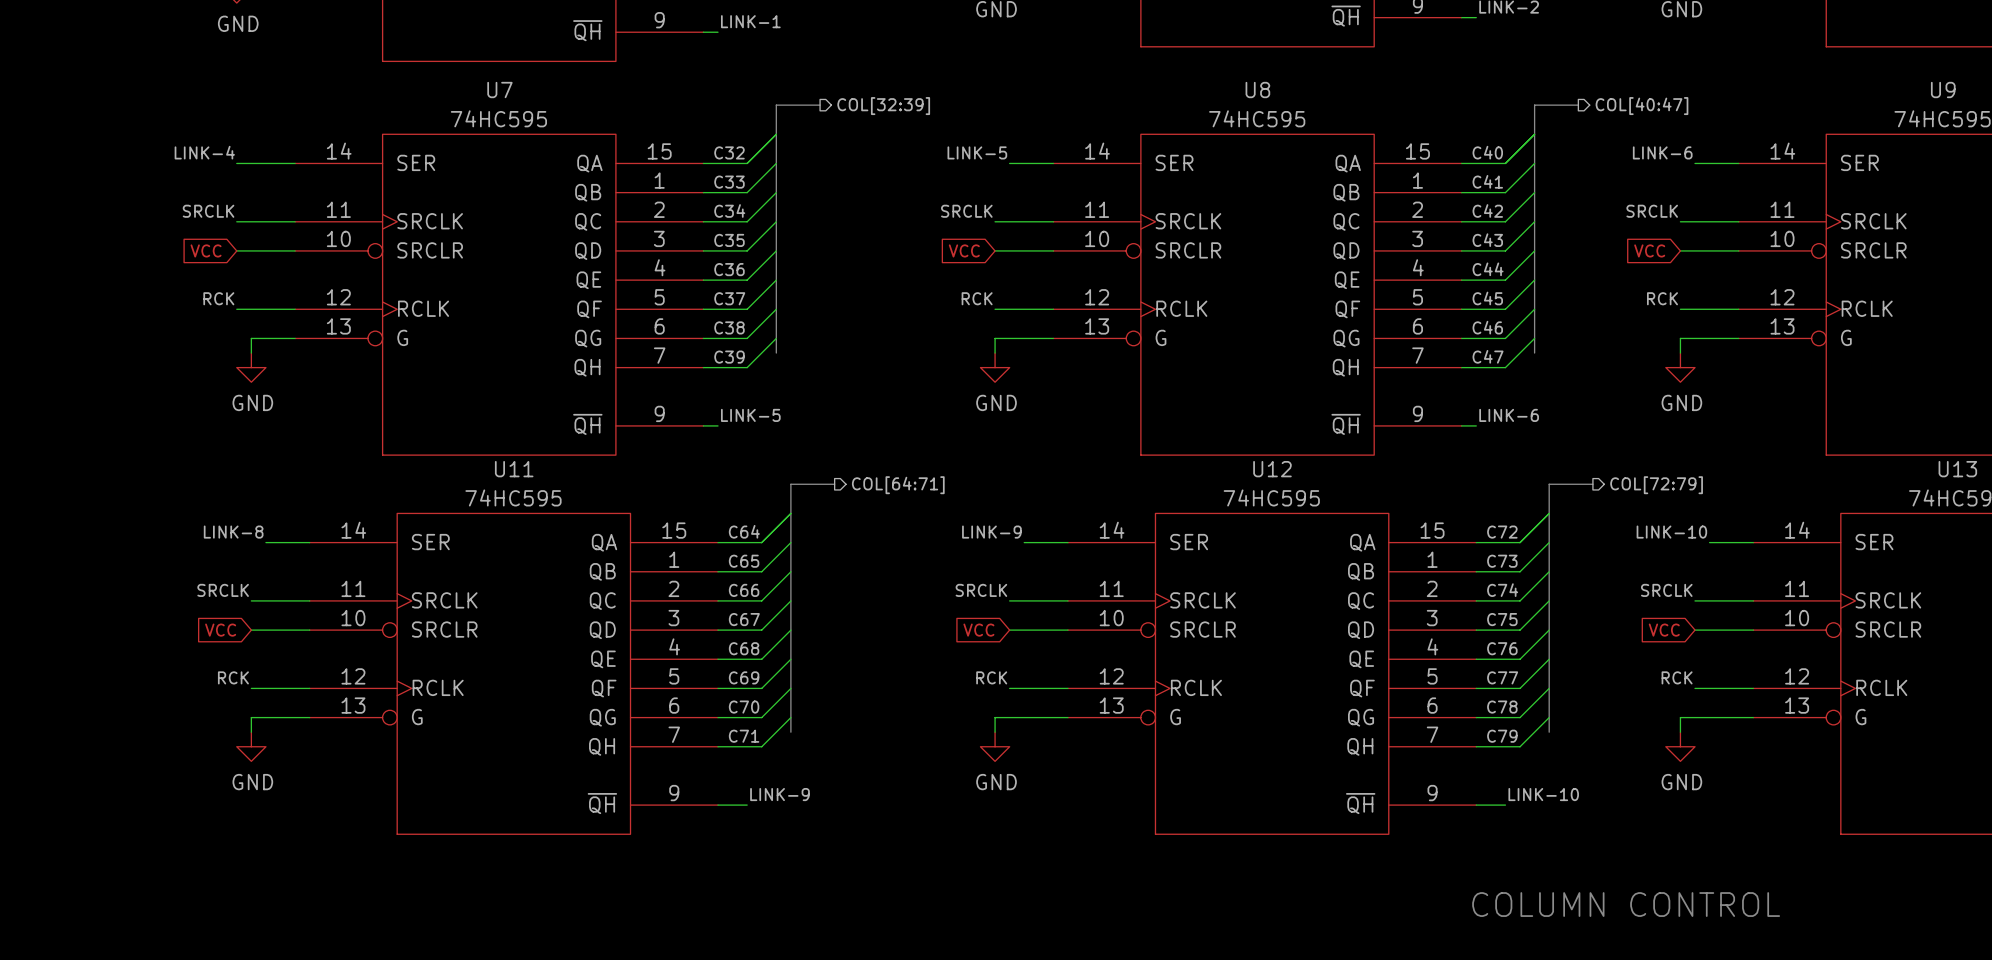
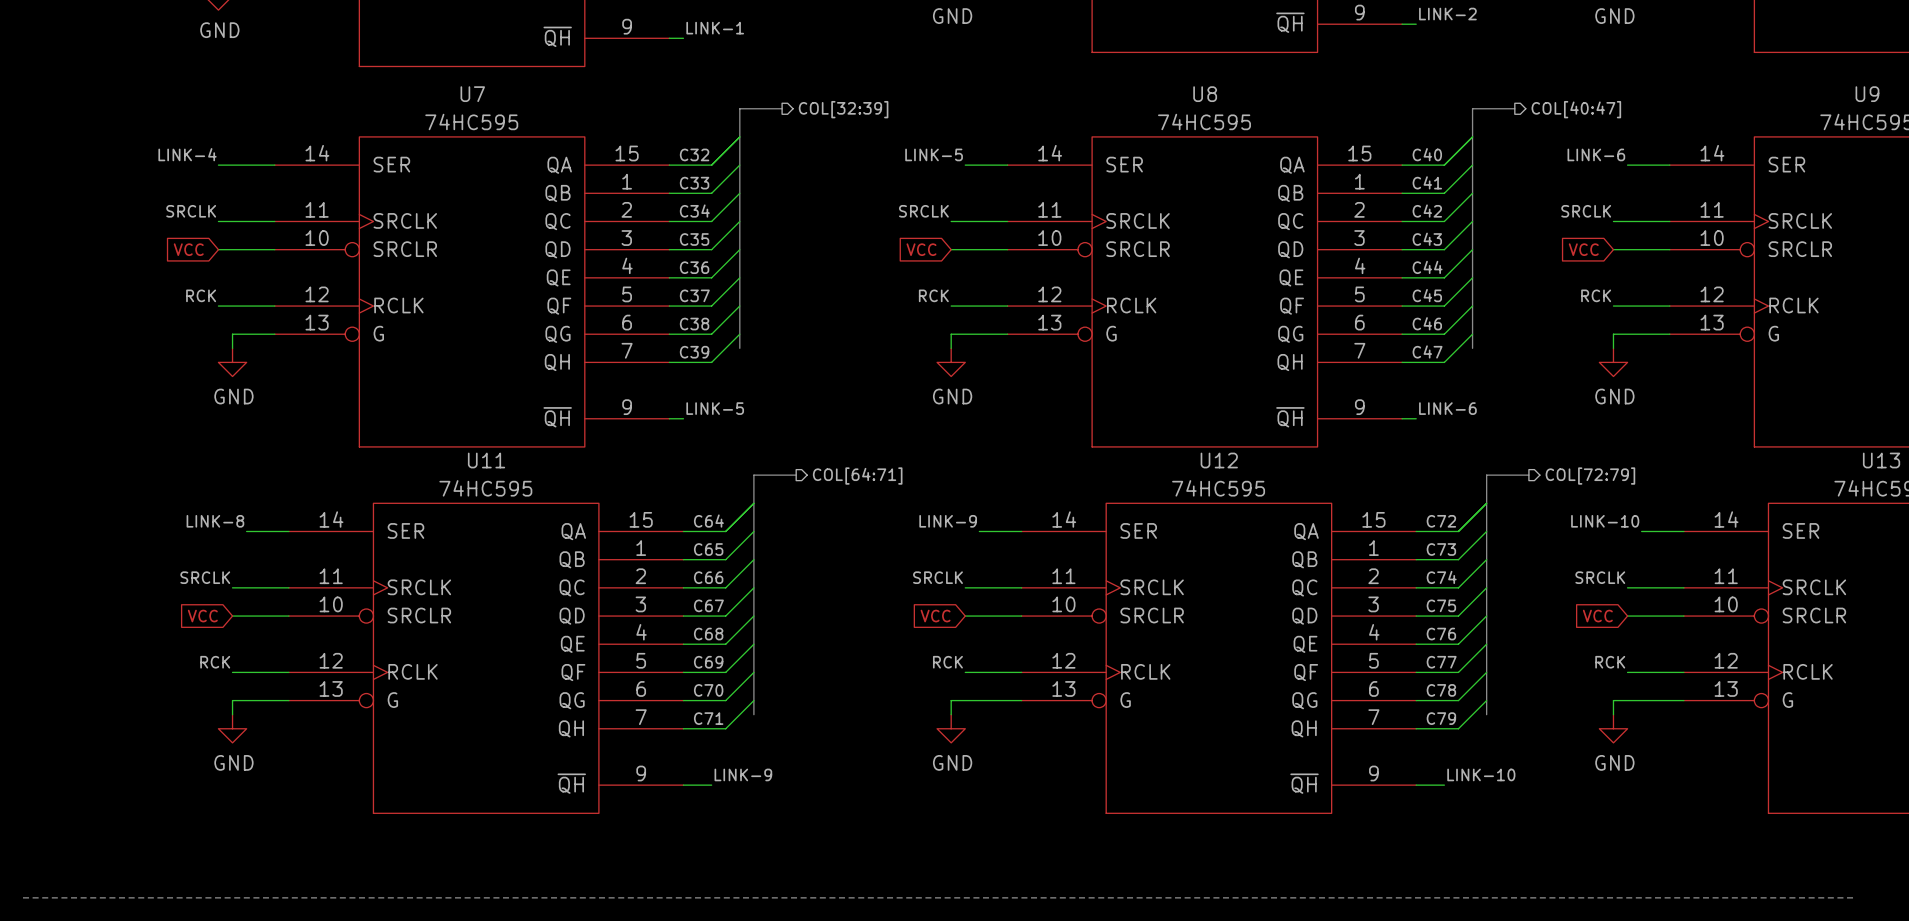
text: COLUMN CONTROL (1626, 904) -> none
line: none -> (21, 897) (1853, 897)

